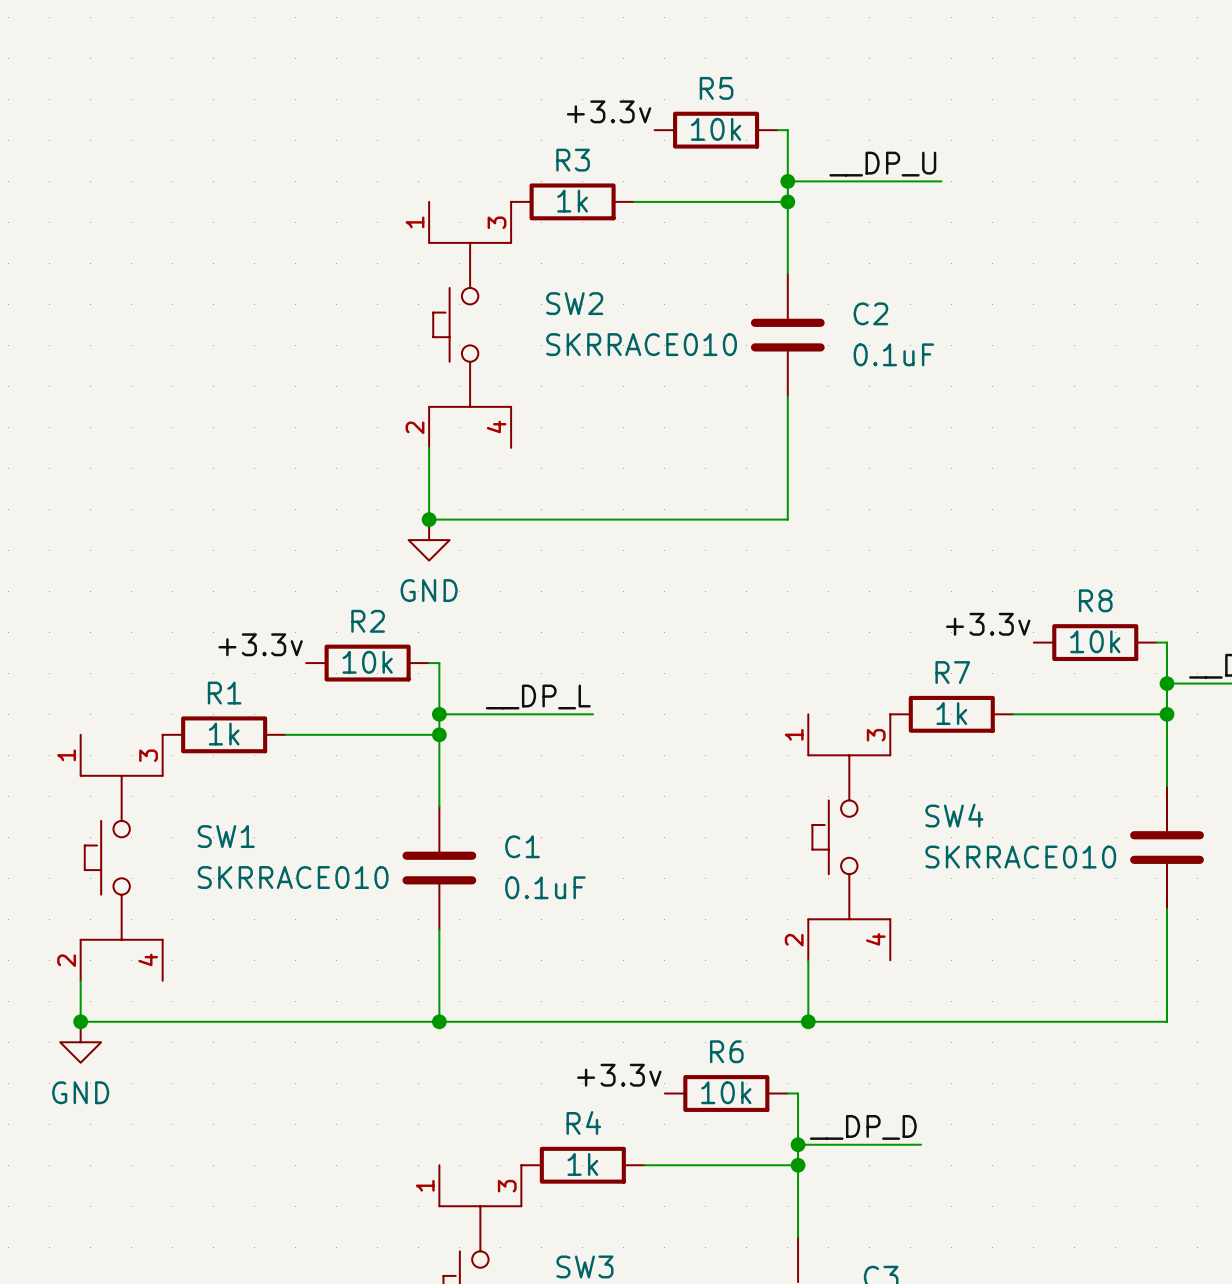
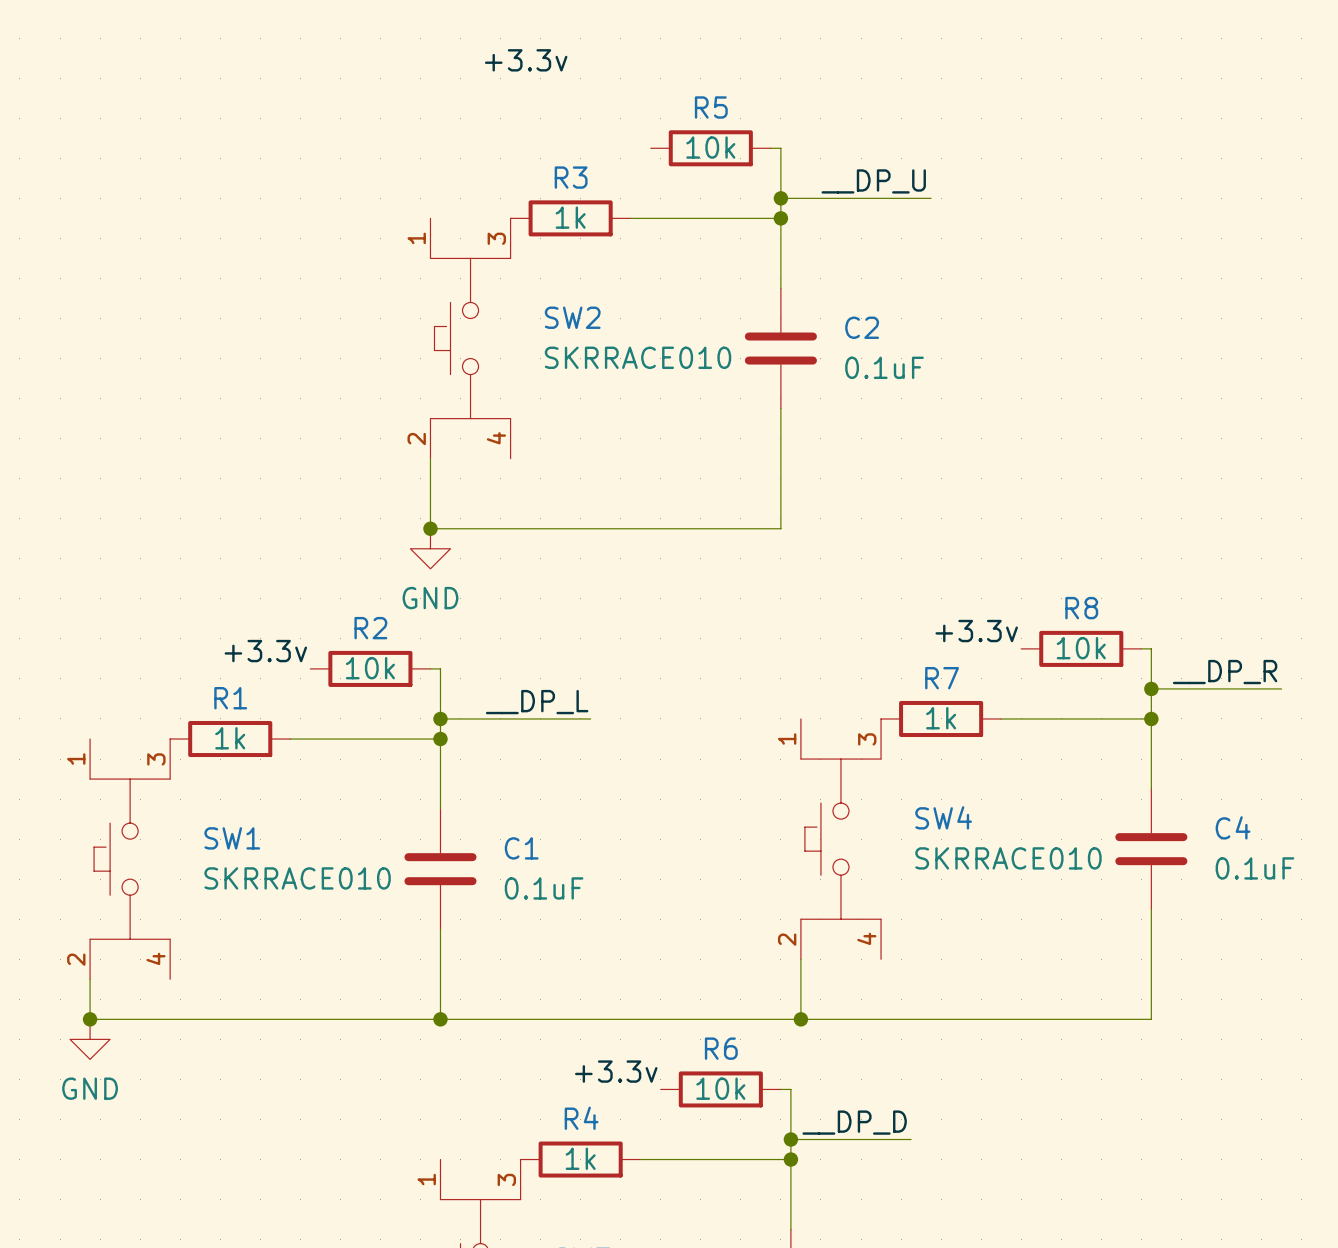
label position: +3.3v (609, 111) -> +3.3v (526, 60)

